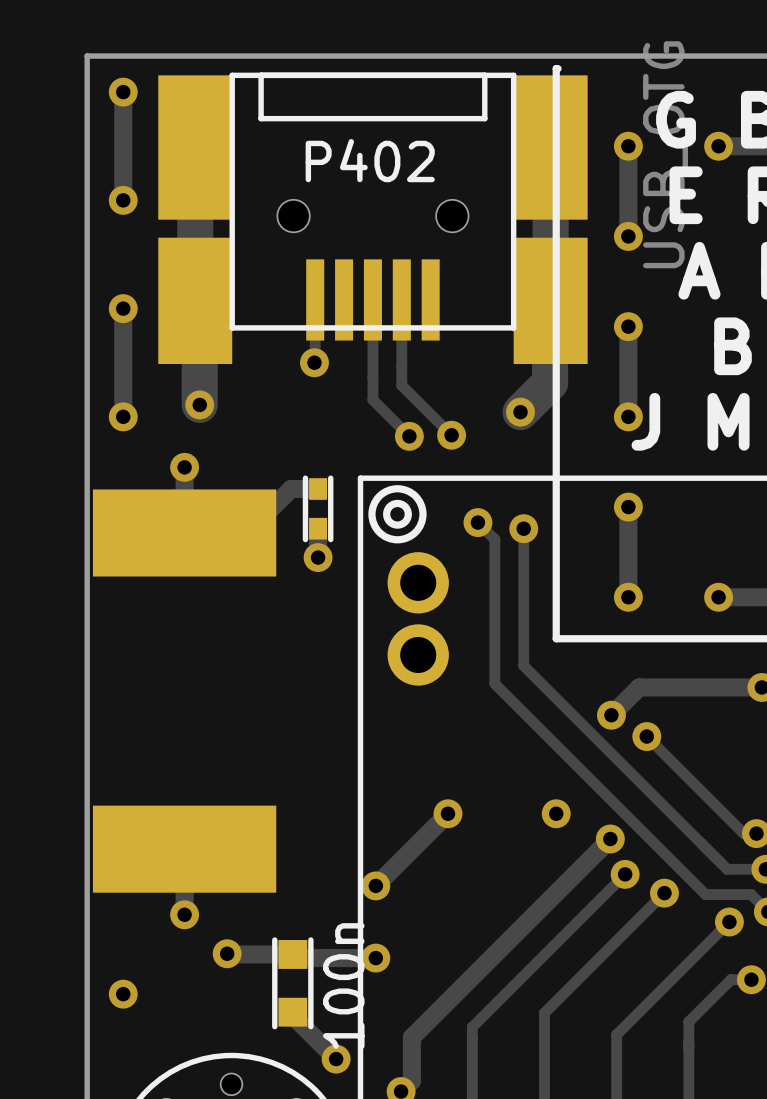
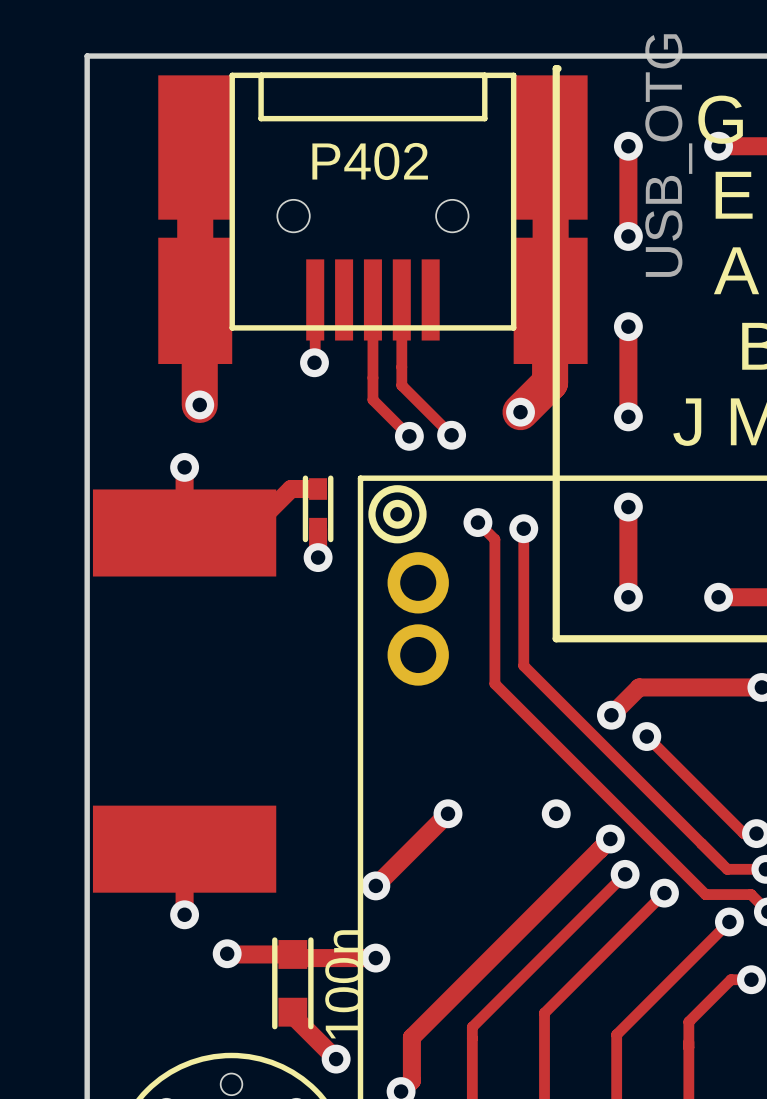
track: (123, 92) (123, 200) -> none
via: (123, 92) -> none
via: (123, 200) -> none
track: (123, 308) (123, 416) -> none
via: (123, 308) -> none
via: (123, 416) -> none
via: (123, 994) -> none

